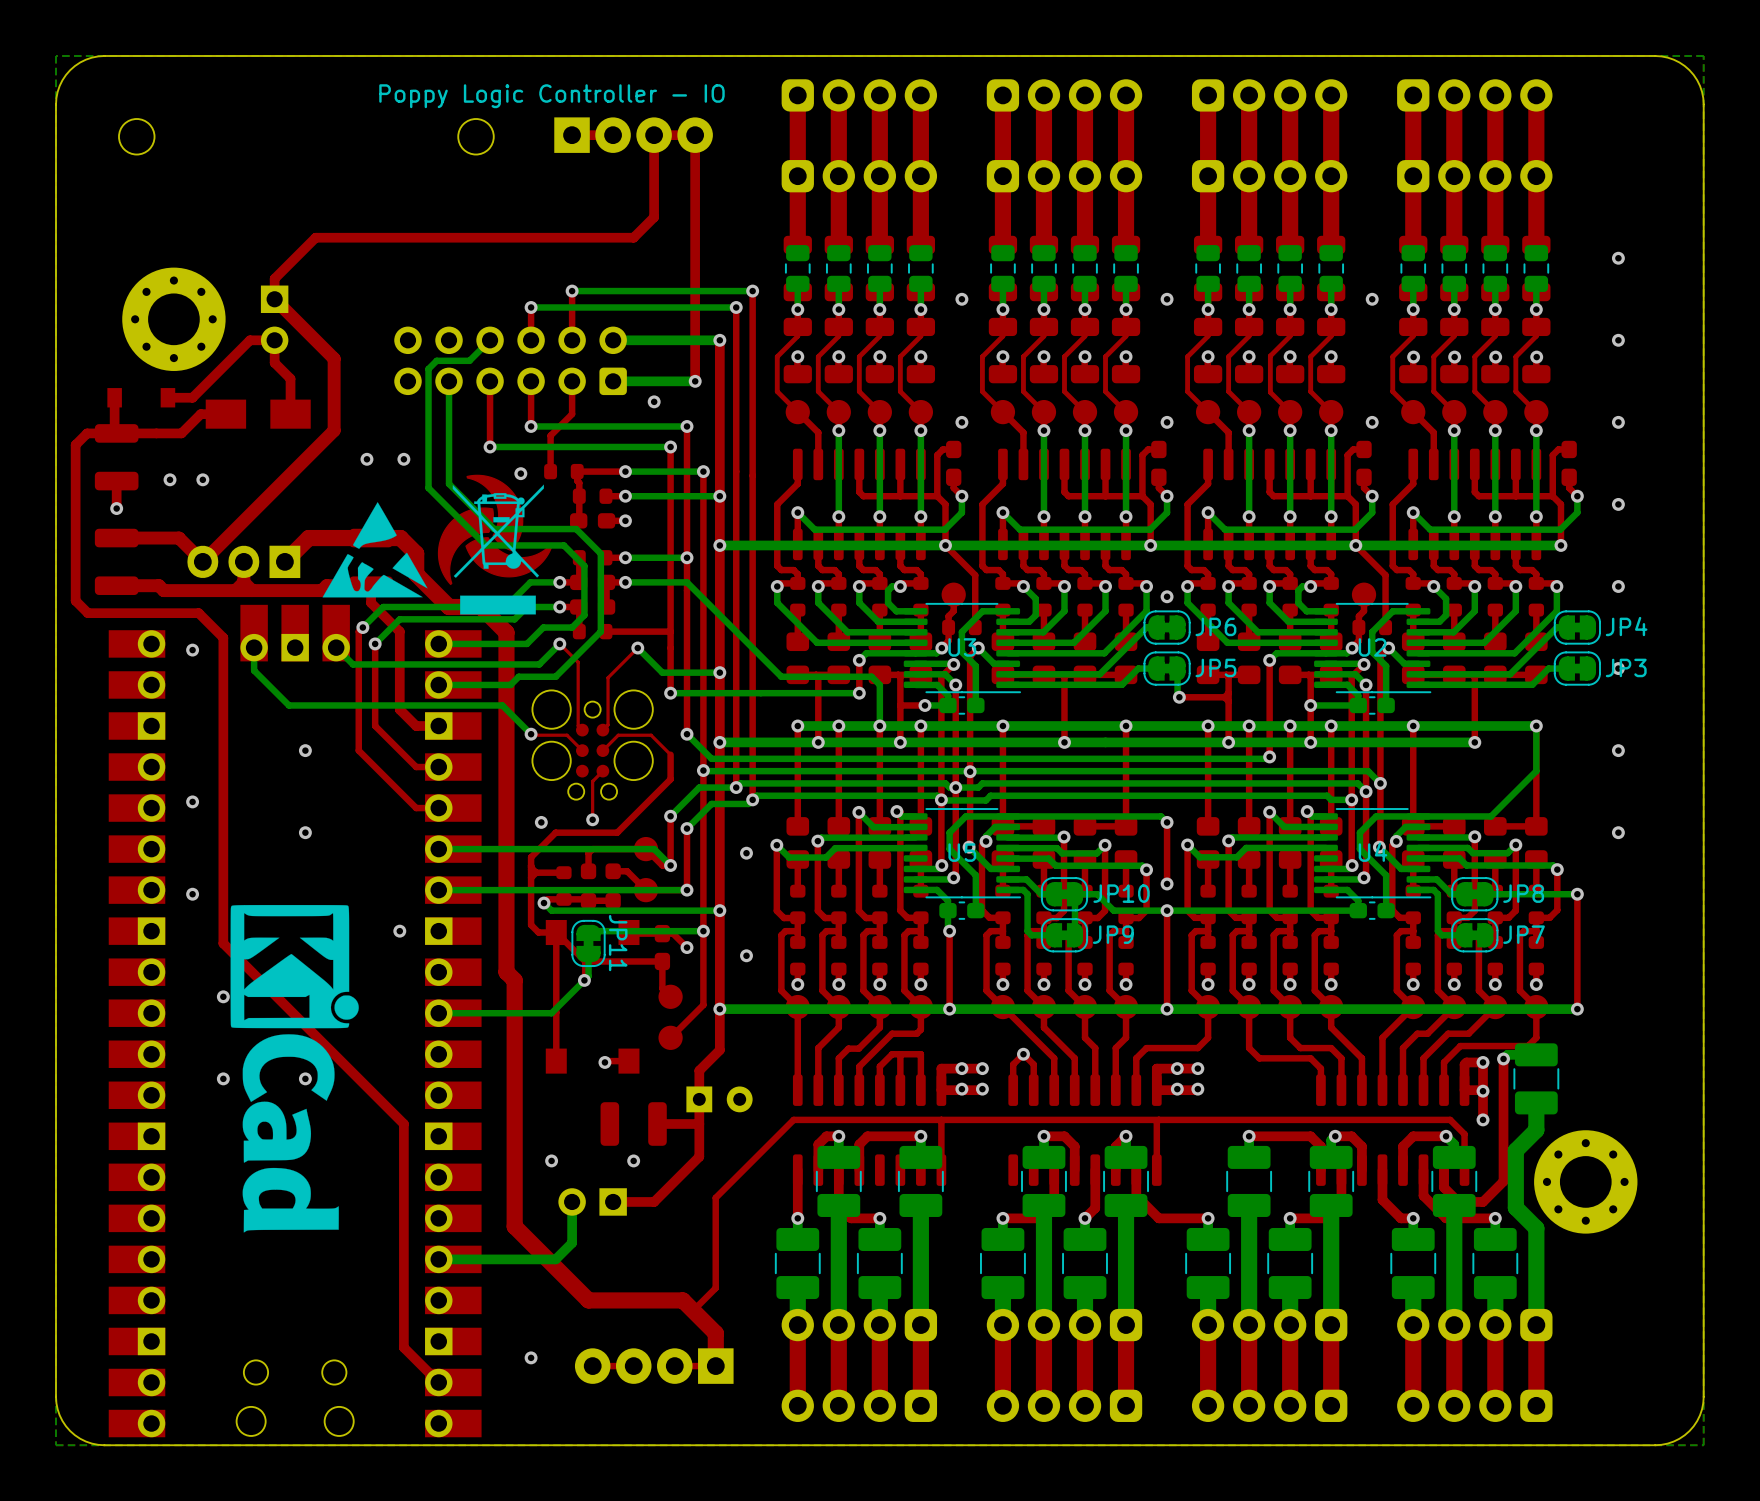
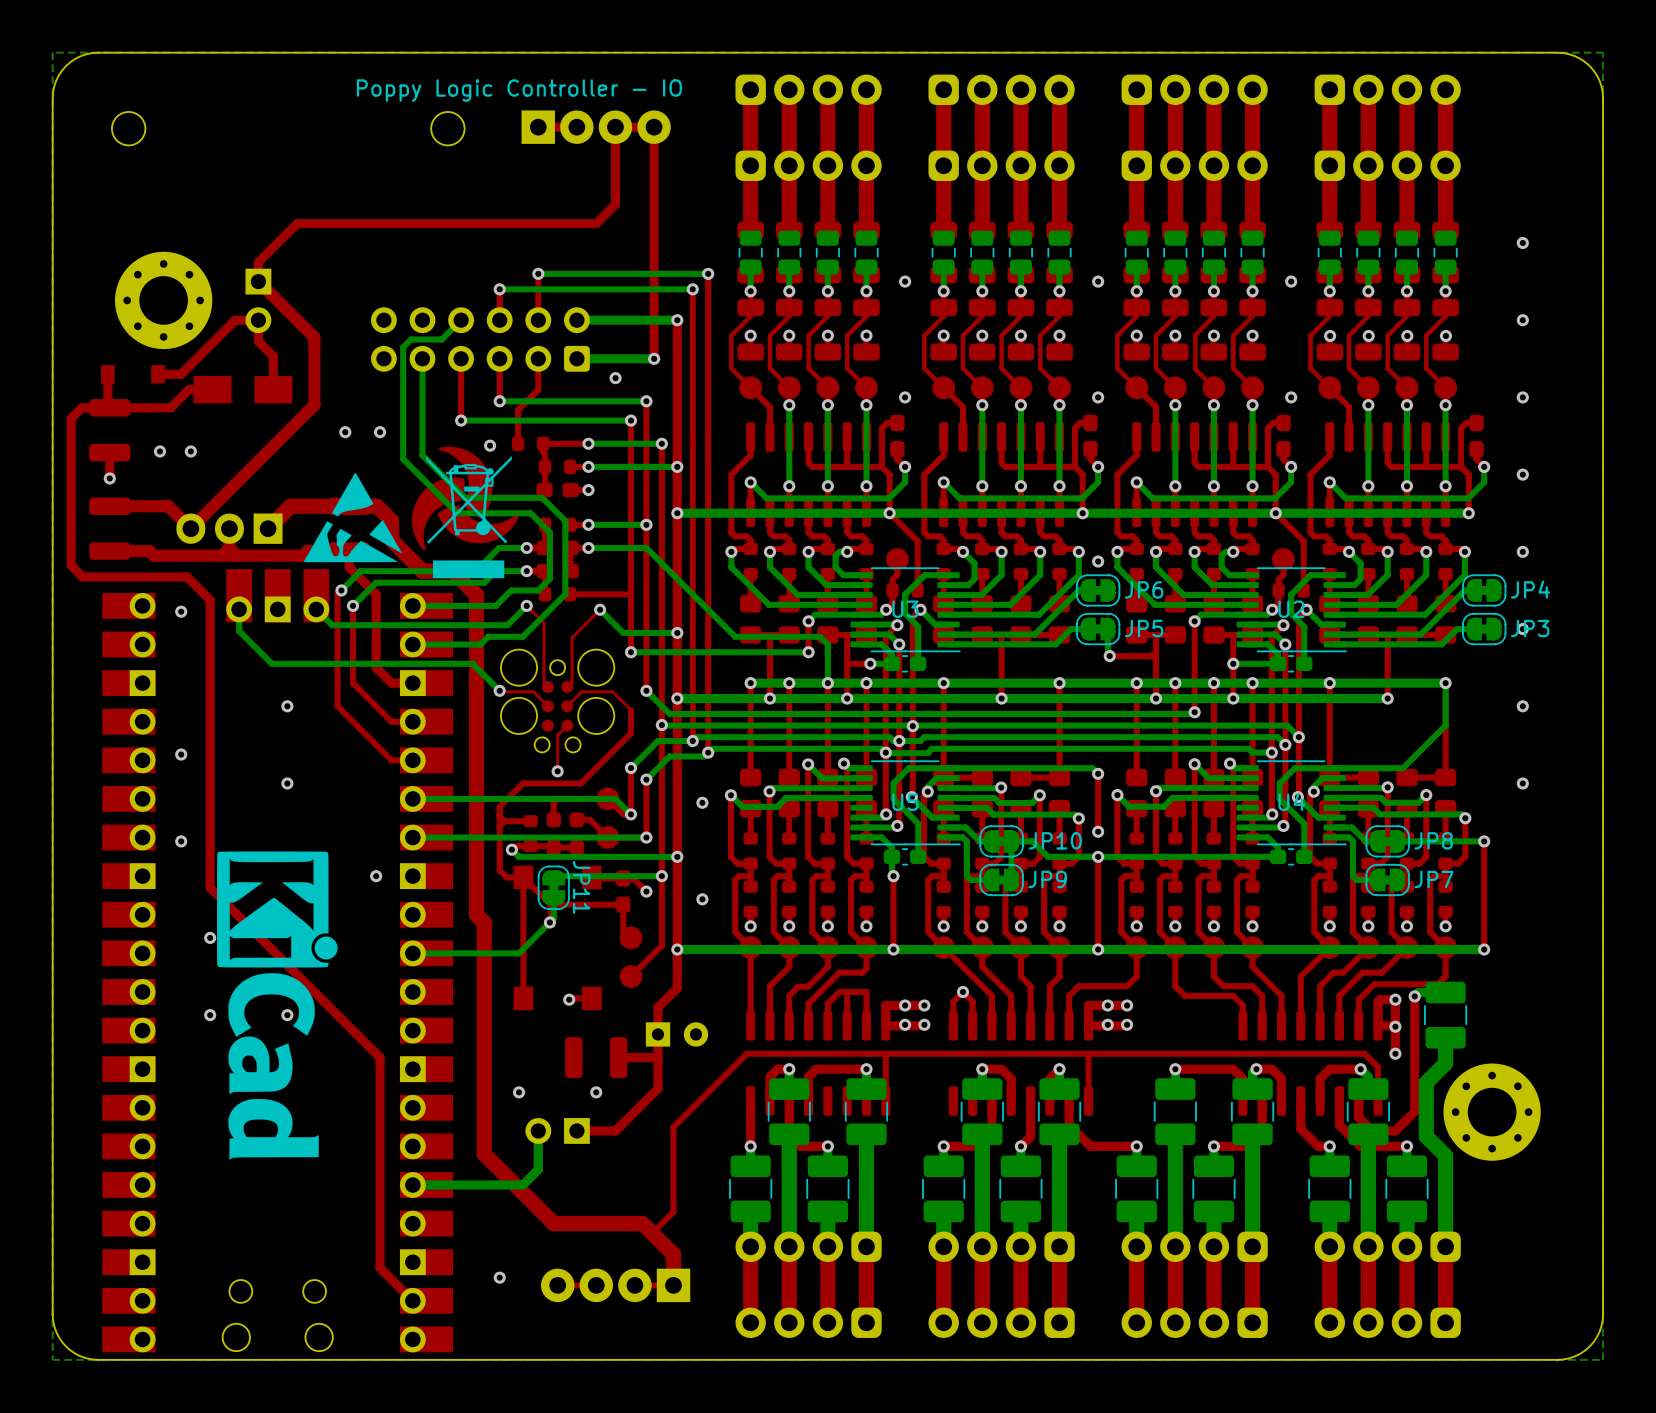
via: (541, 822) -> none

